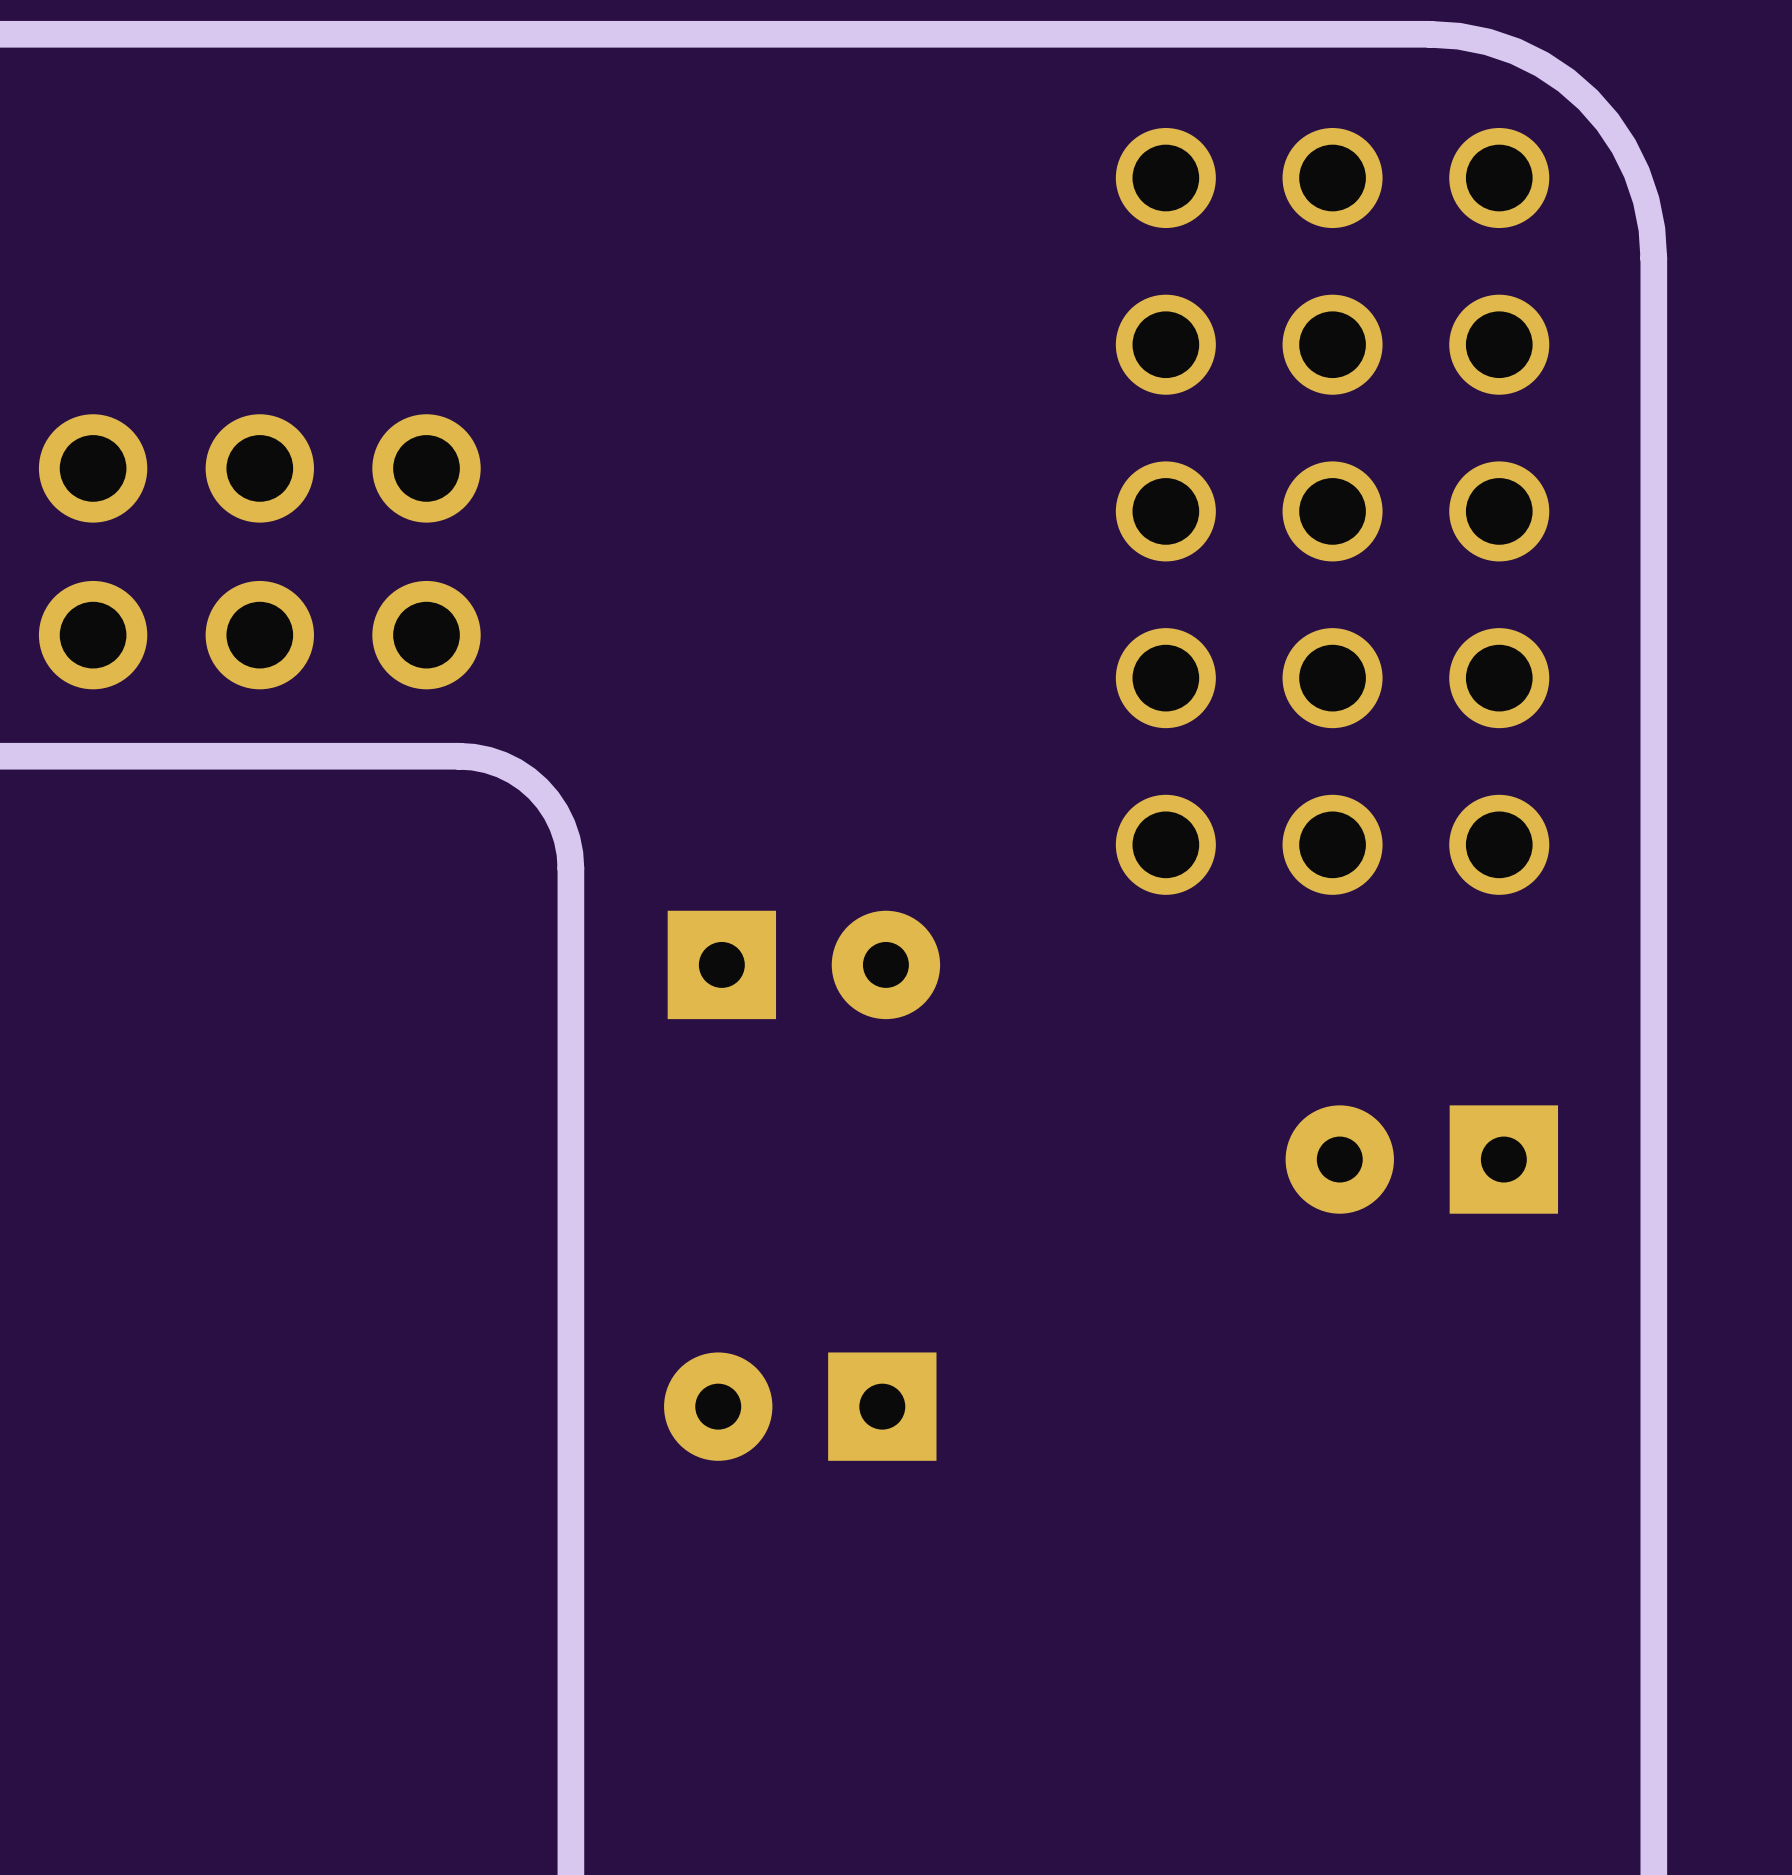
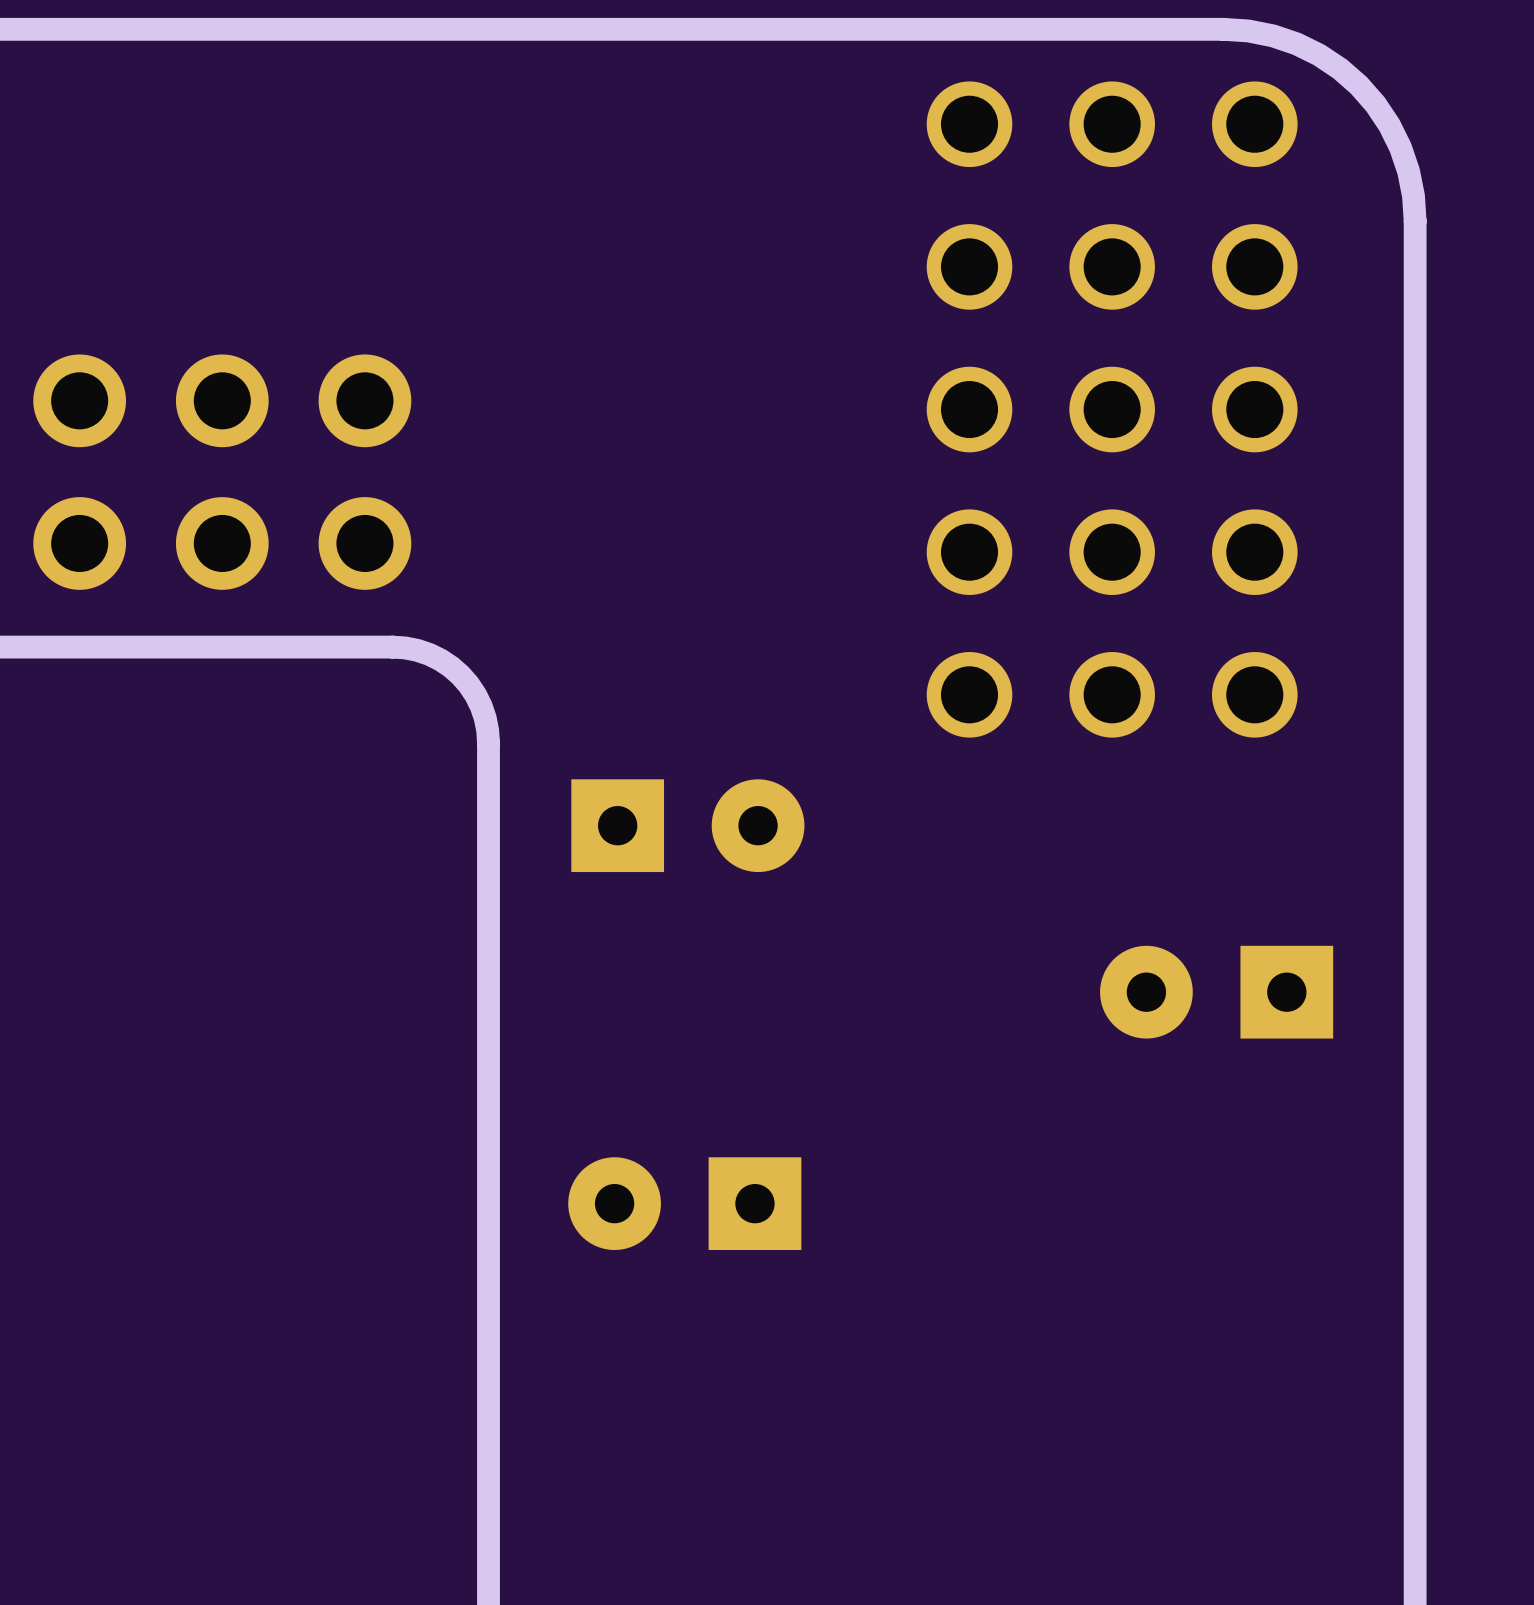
part position: (1332, 178) -> (1112, 124)
part position: (1332, 344) -> (1112, 266)
part position: (1332, 511) -> (1112, 409)
part position: (1332, 678) -> (1112, 552)
part position: (1332, 844) -> (1112, 694)

